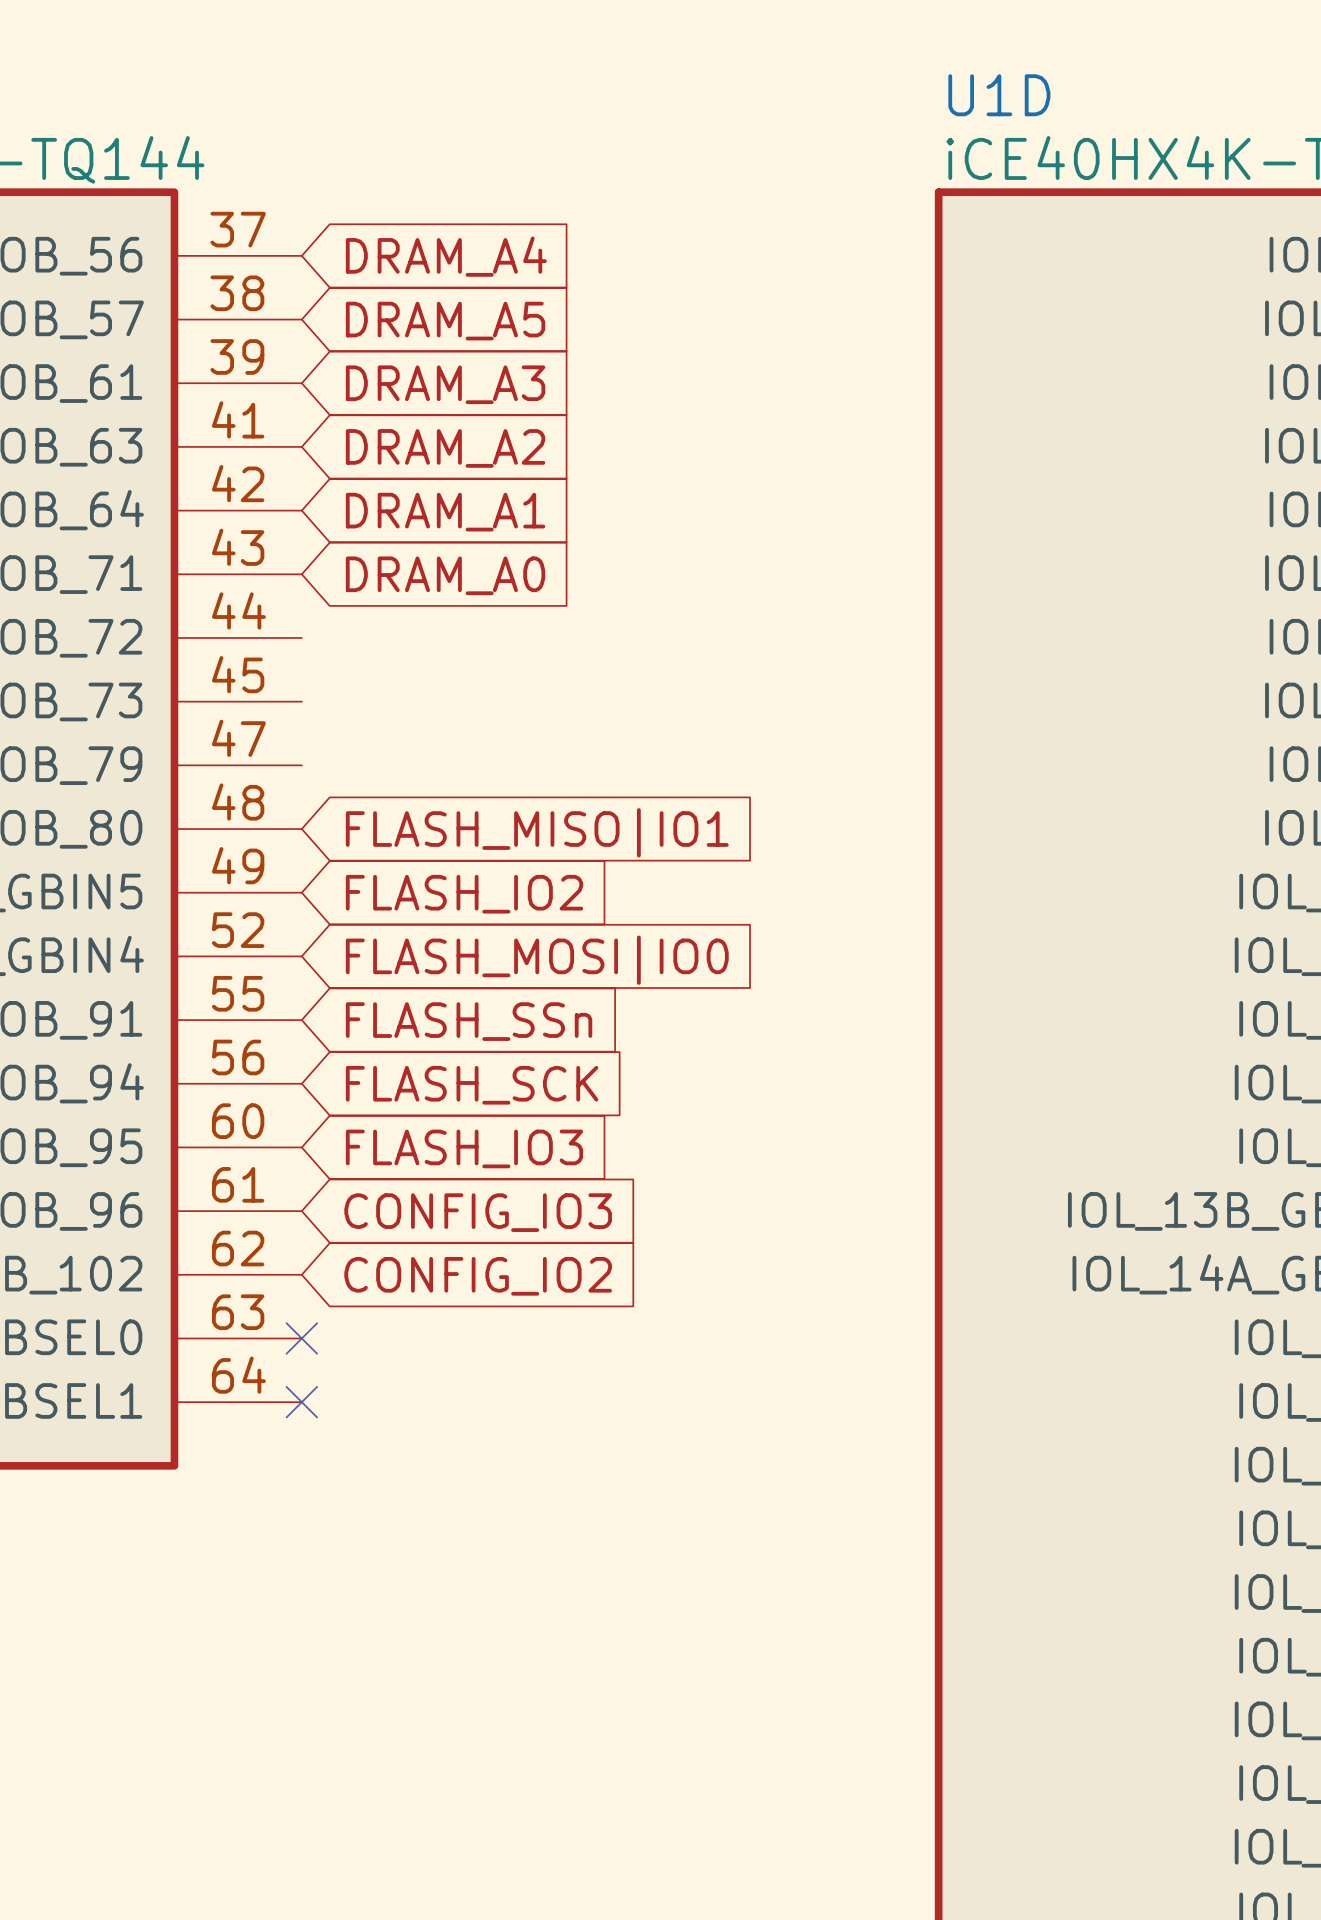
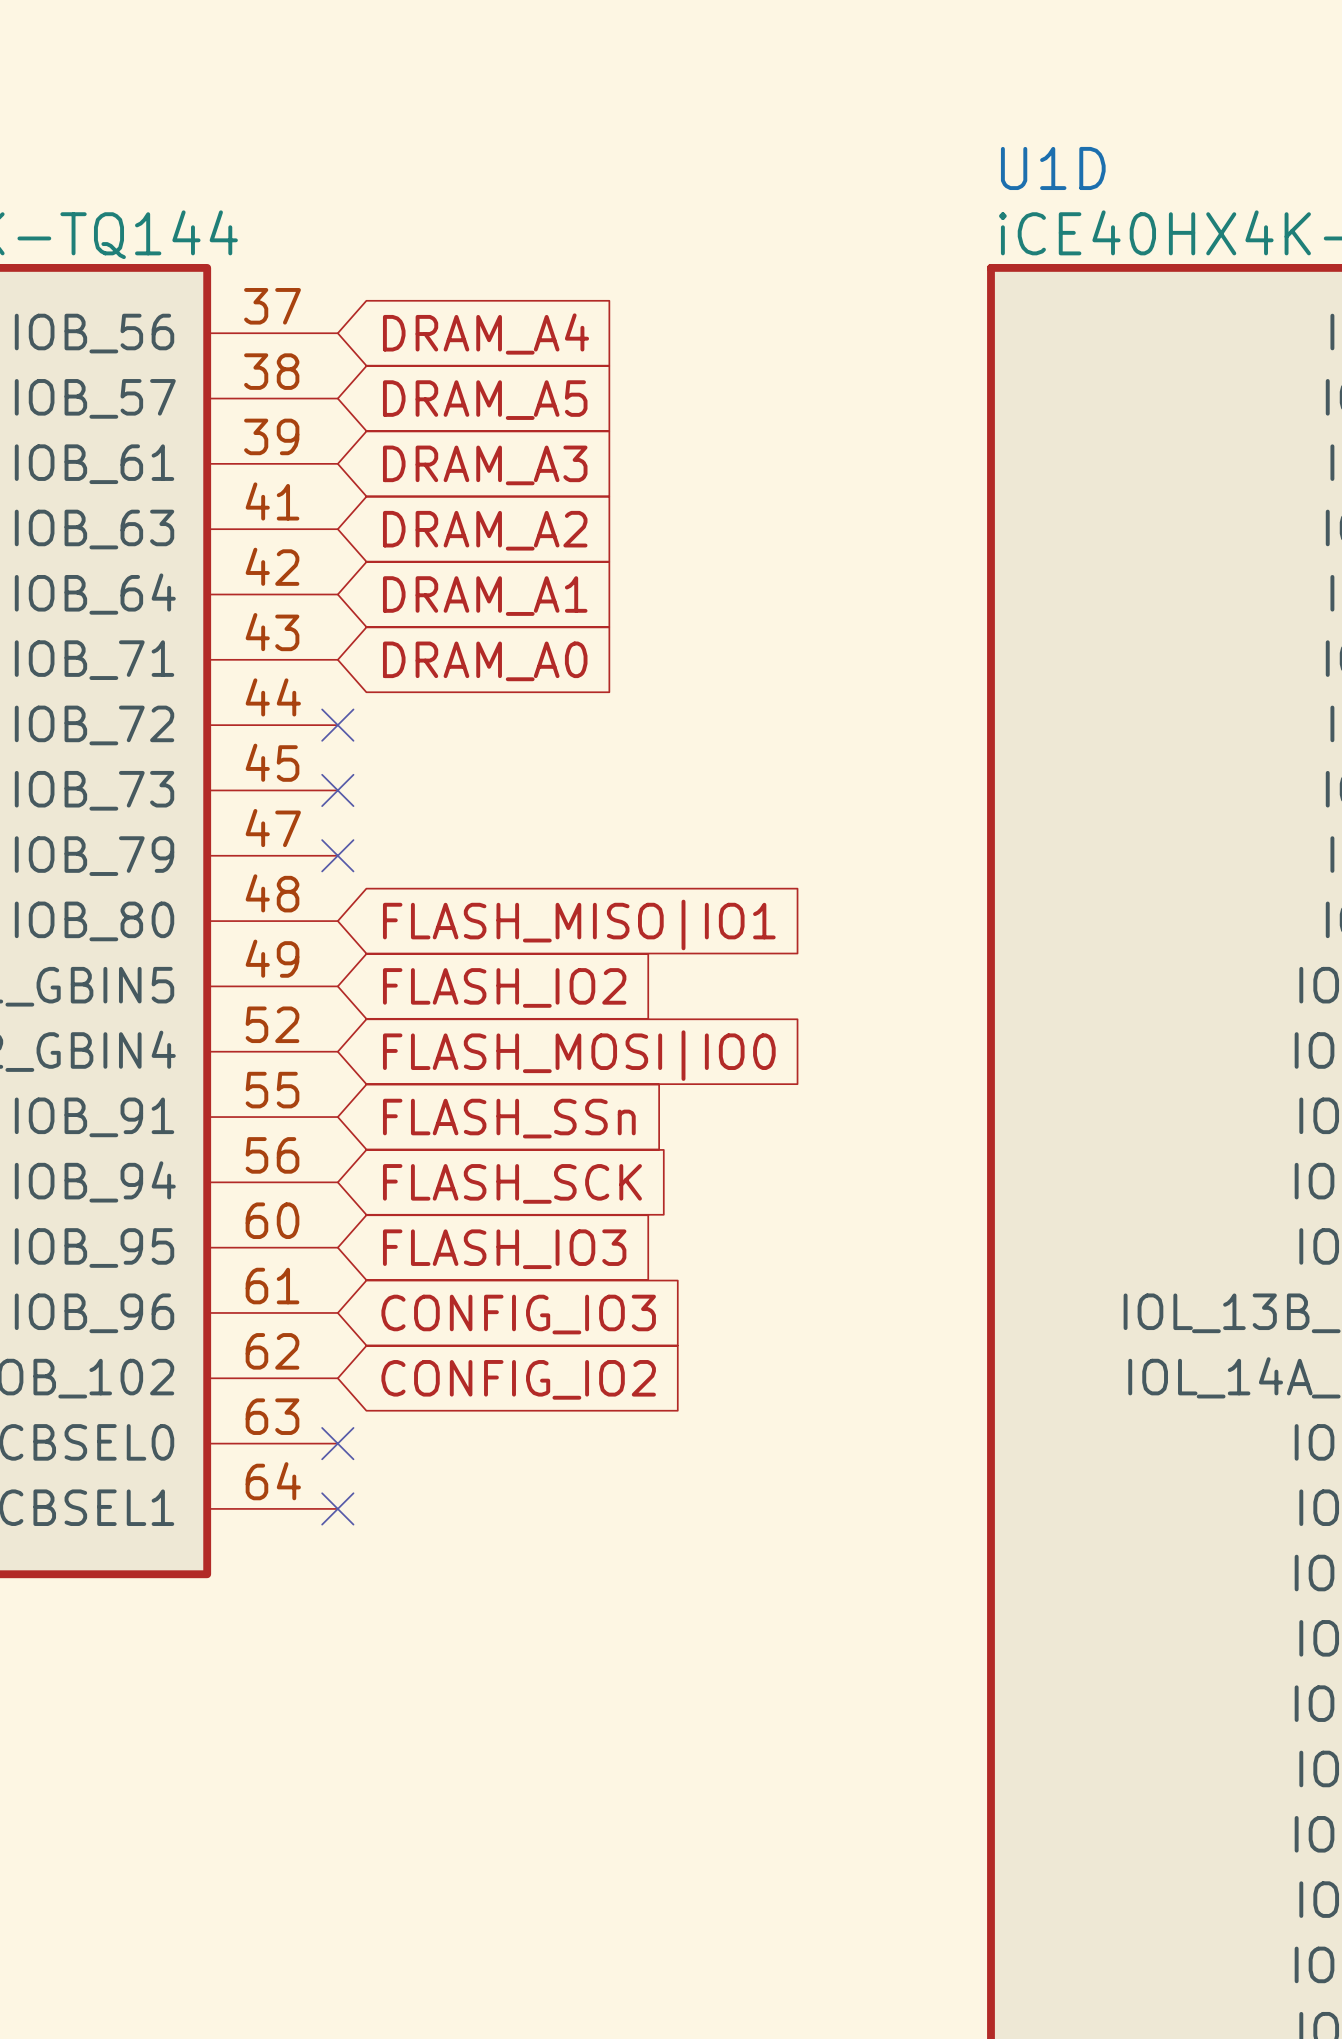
no-connect mark: none -> (337, 725)
no-connect mark: none -> (337, 790)
no-connect mark: none -> (337, 855)

